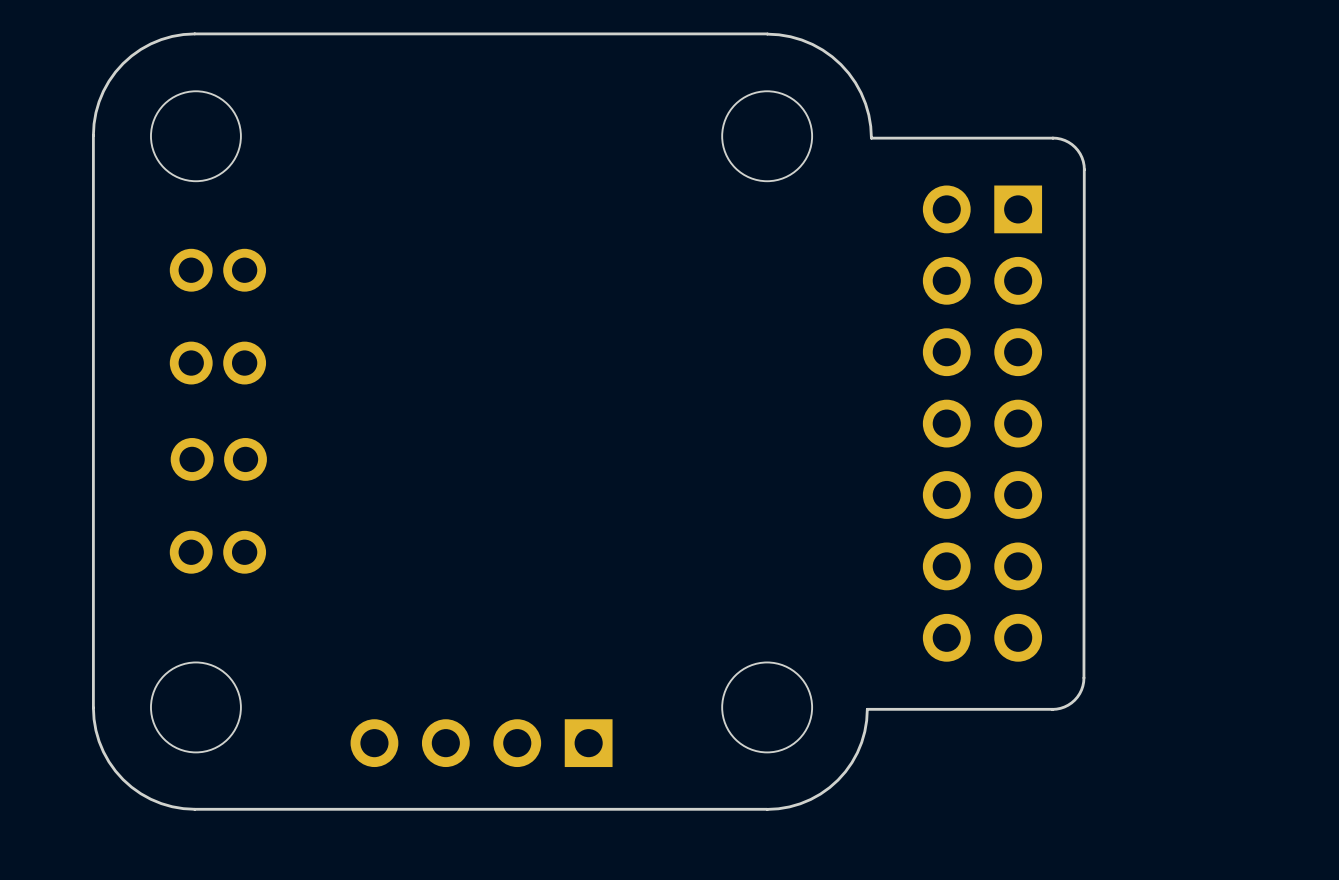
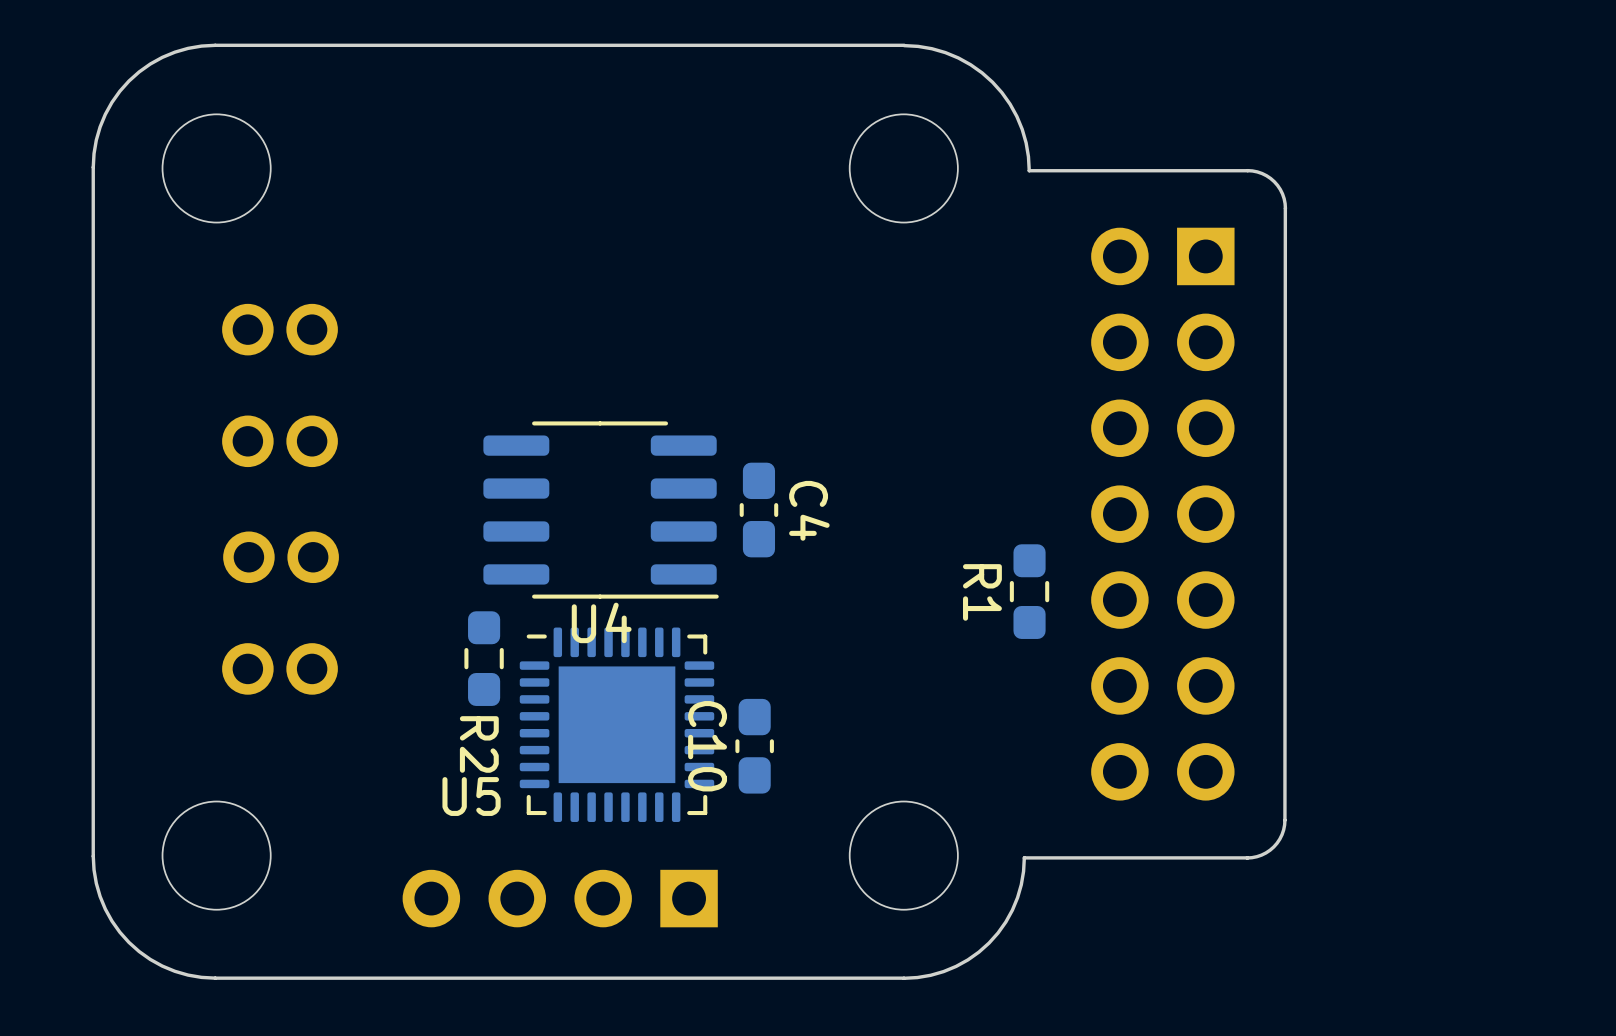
part position: (217, 270) -> (280, 329)
part position: (217, 363) -> (280, 441)
U4: none -> (601, 510)
C4: none -> (758, 510)
part position: (218, 459) -> (281, 557)
R1: none -> (1029, 591)
R2: none -> (484, 658)
part position: (217, 552) -> (280, 668)
U5: none -> (616, 724)
C10: none -> (754, 746)

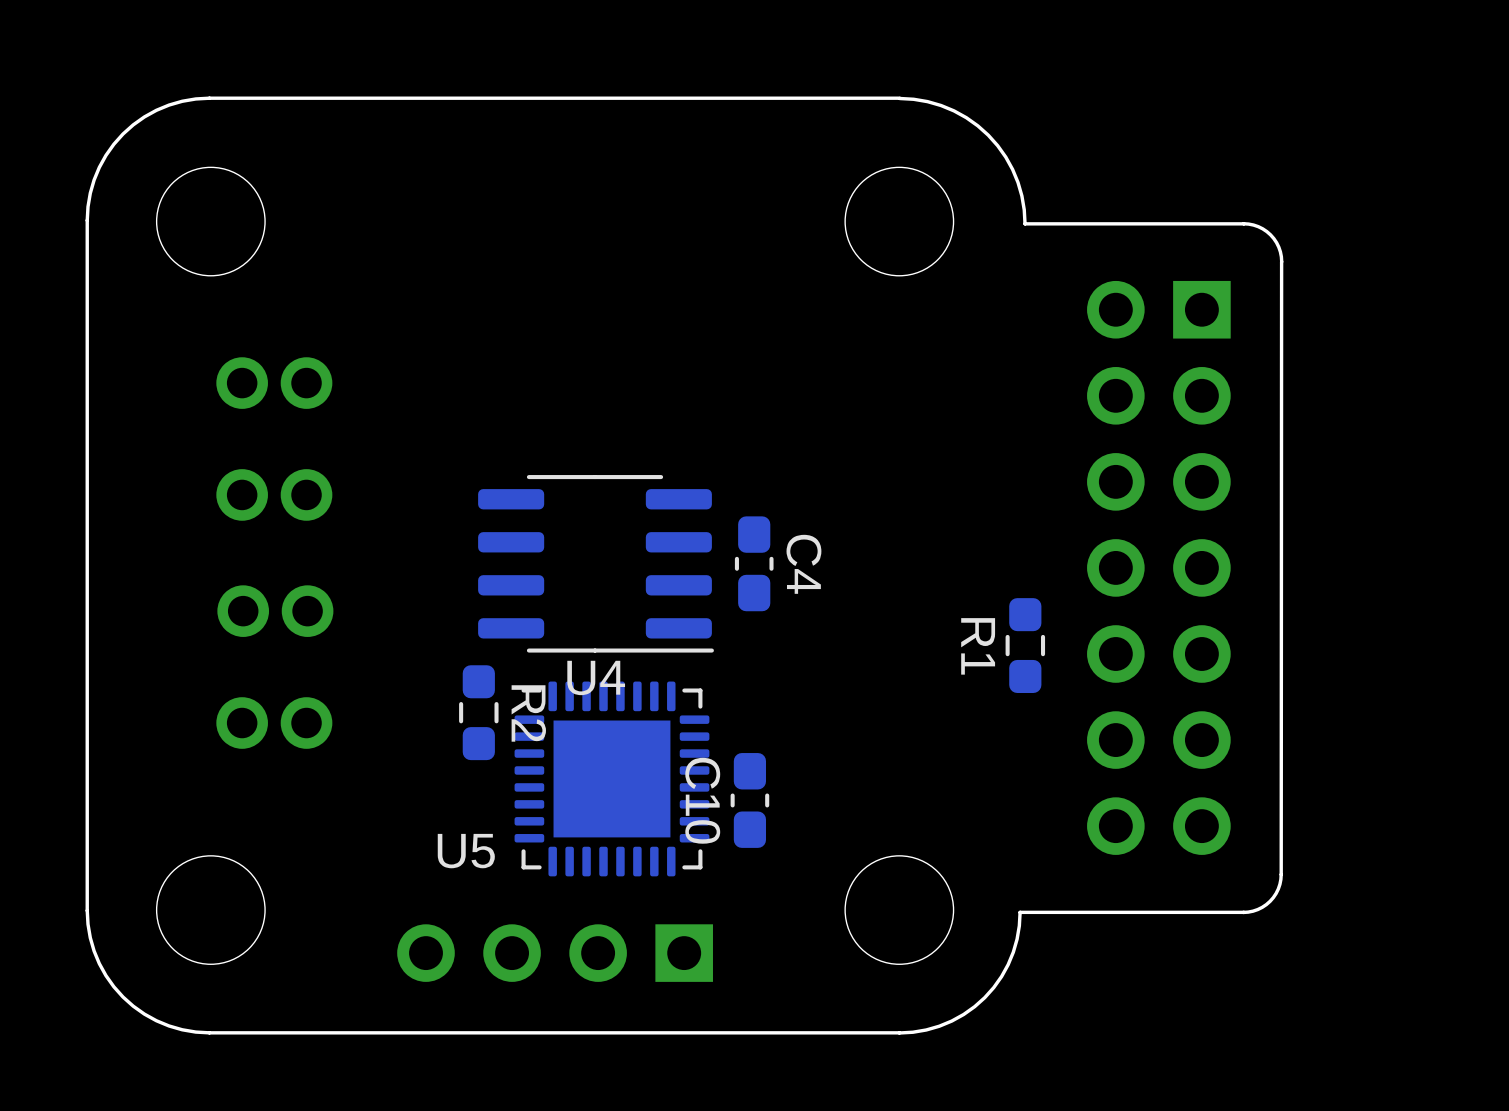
R2 name position: R2 (479, 744) -> R2 (528, 713)

